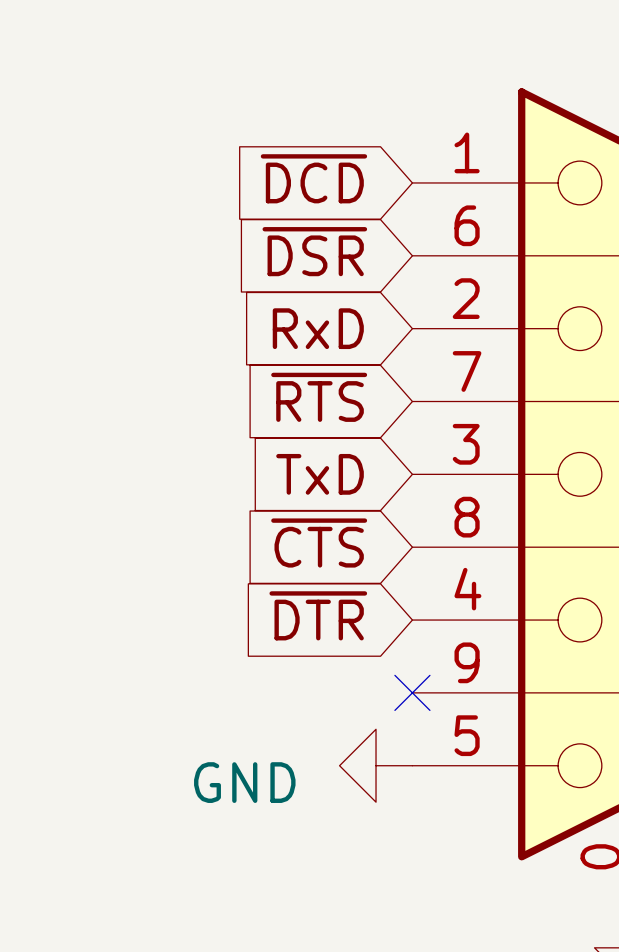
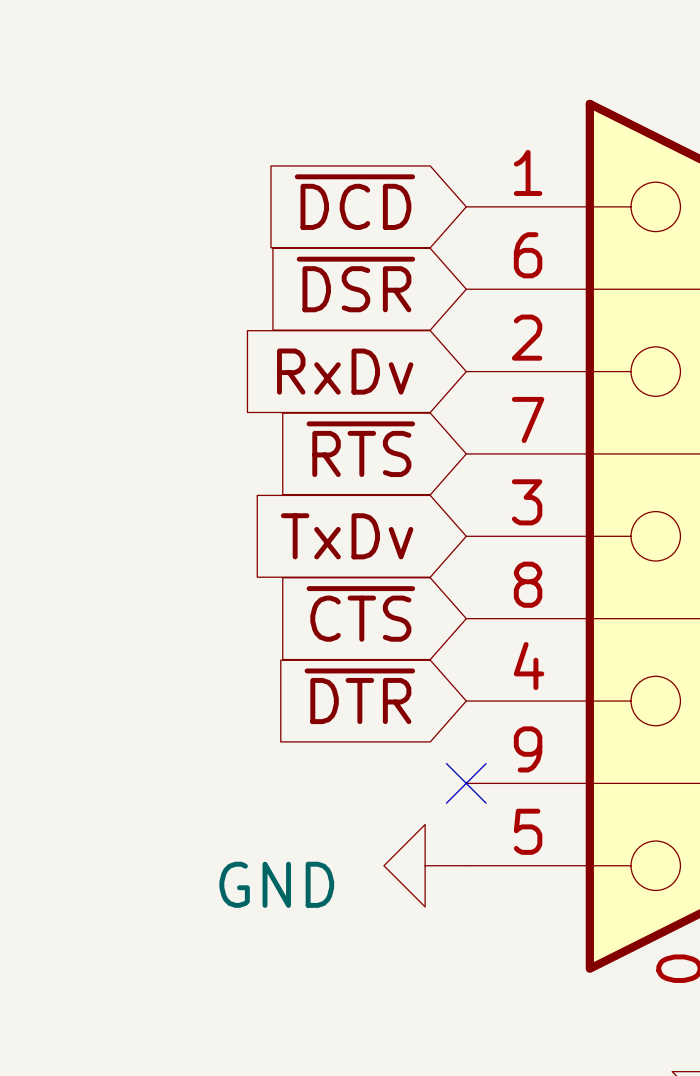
global label: RxD (318, 328) -> RxDv (345, 371)
global label: TxD (320, 474) -> TxDv (347, 536)

